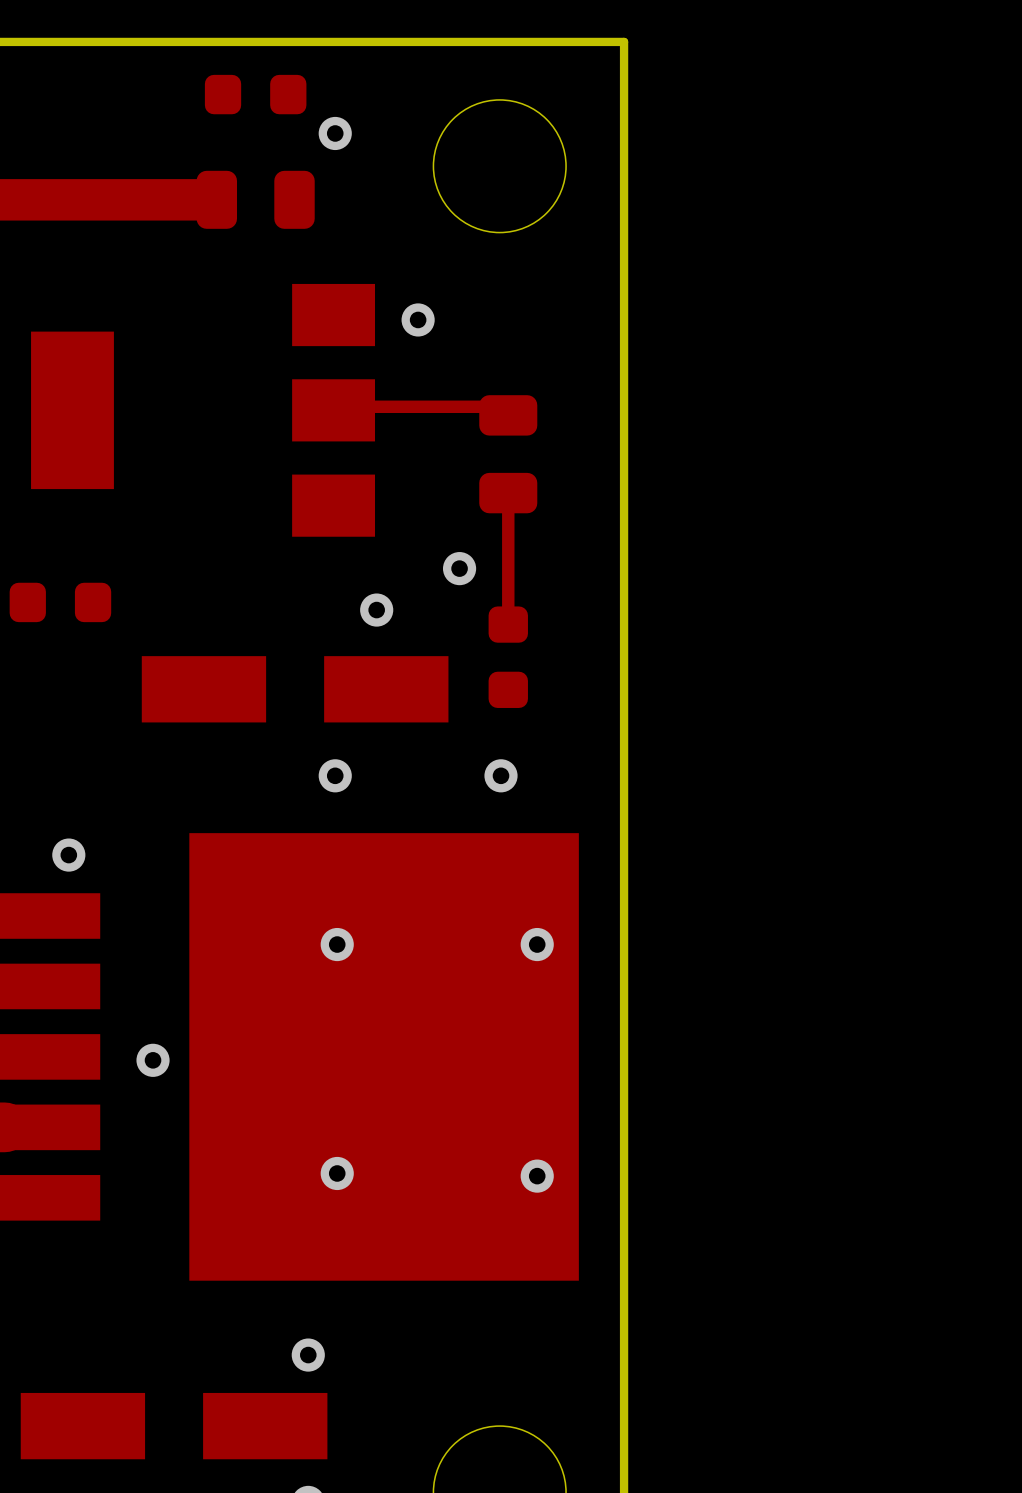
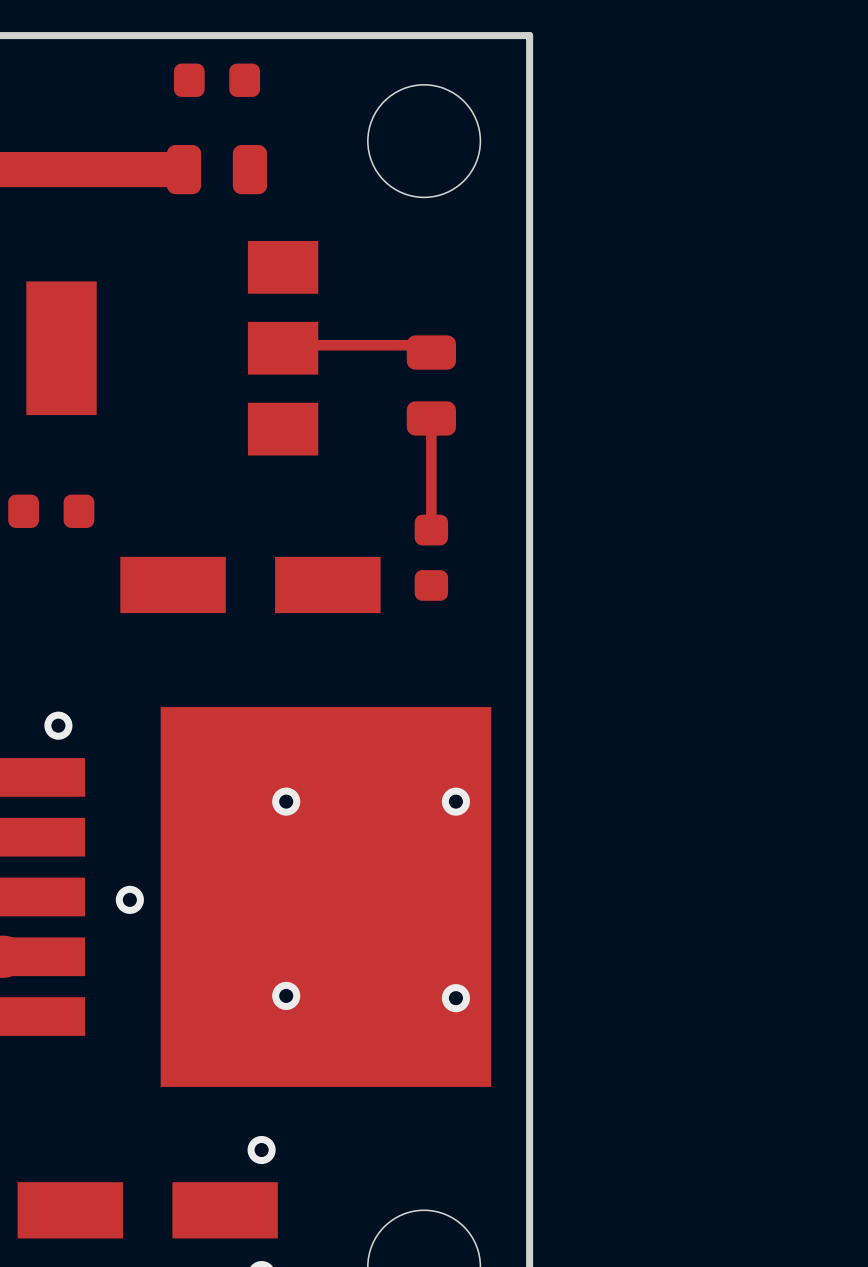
via: (335, 133) -> none
via: (418, 319) -> none
via: (459, 568) -> none
via: (376, 610) -> none
via: (335, 775) -> none
via: (501, 775) -> none

